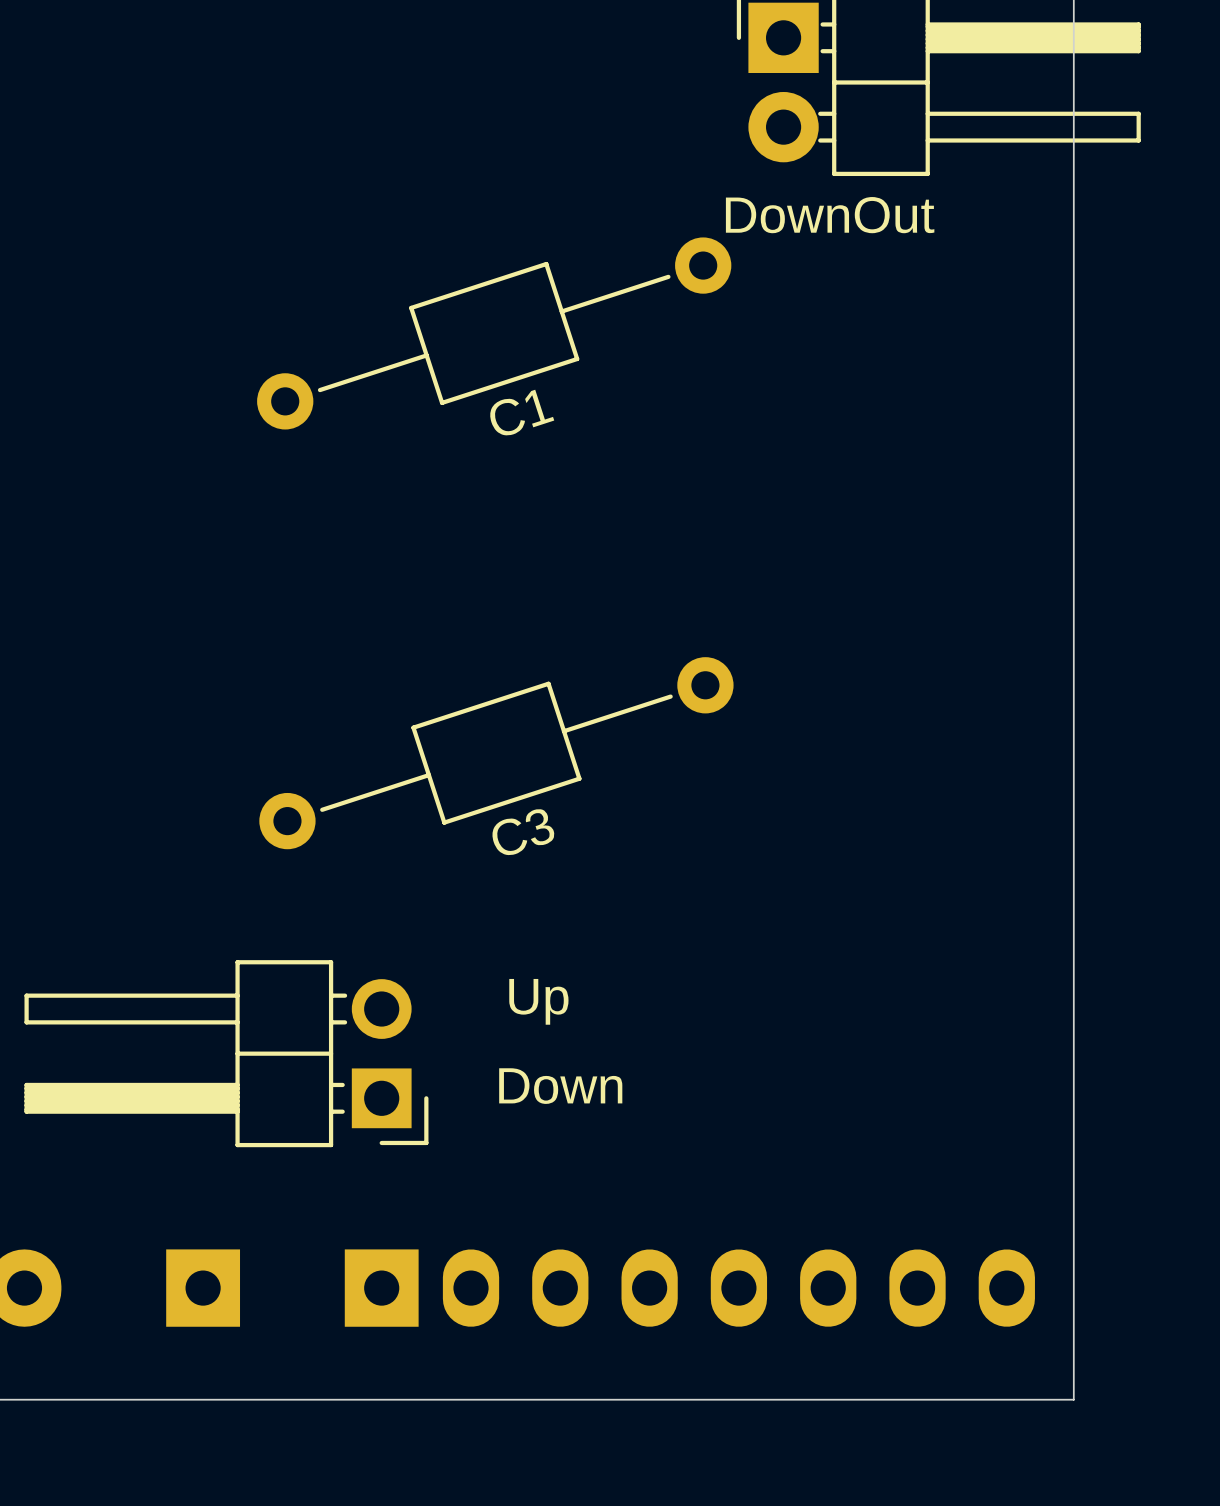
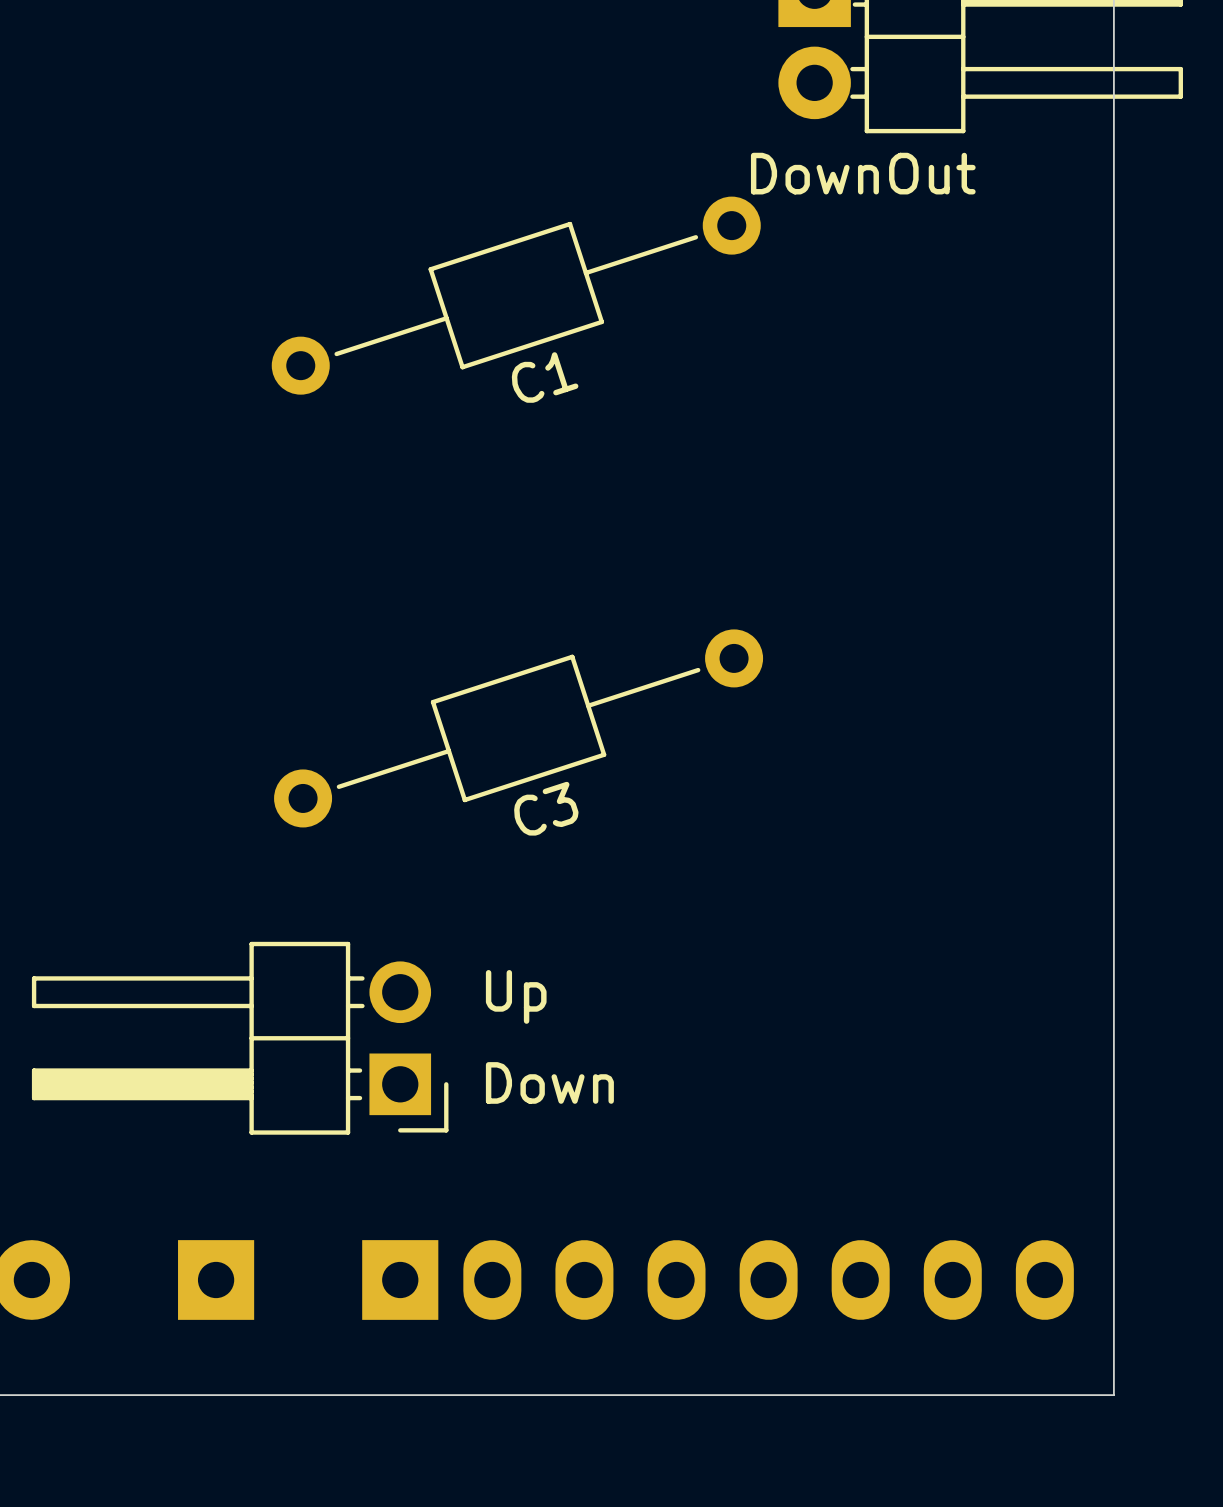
text position: Up (538, 1001) -> Up (516, 996)
text position: Down (560, 1086) -> Down (549, 1082)

